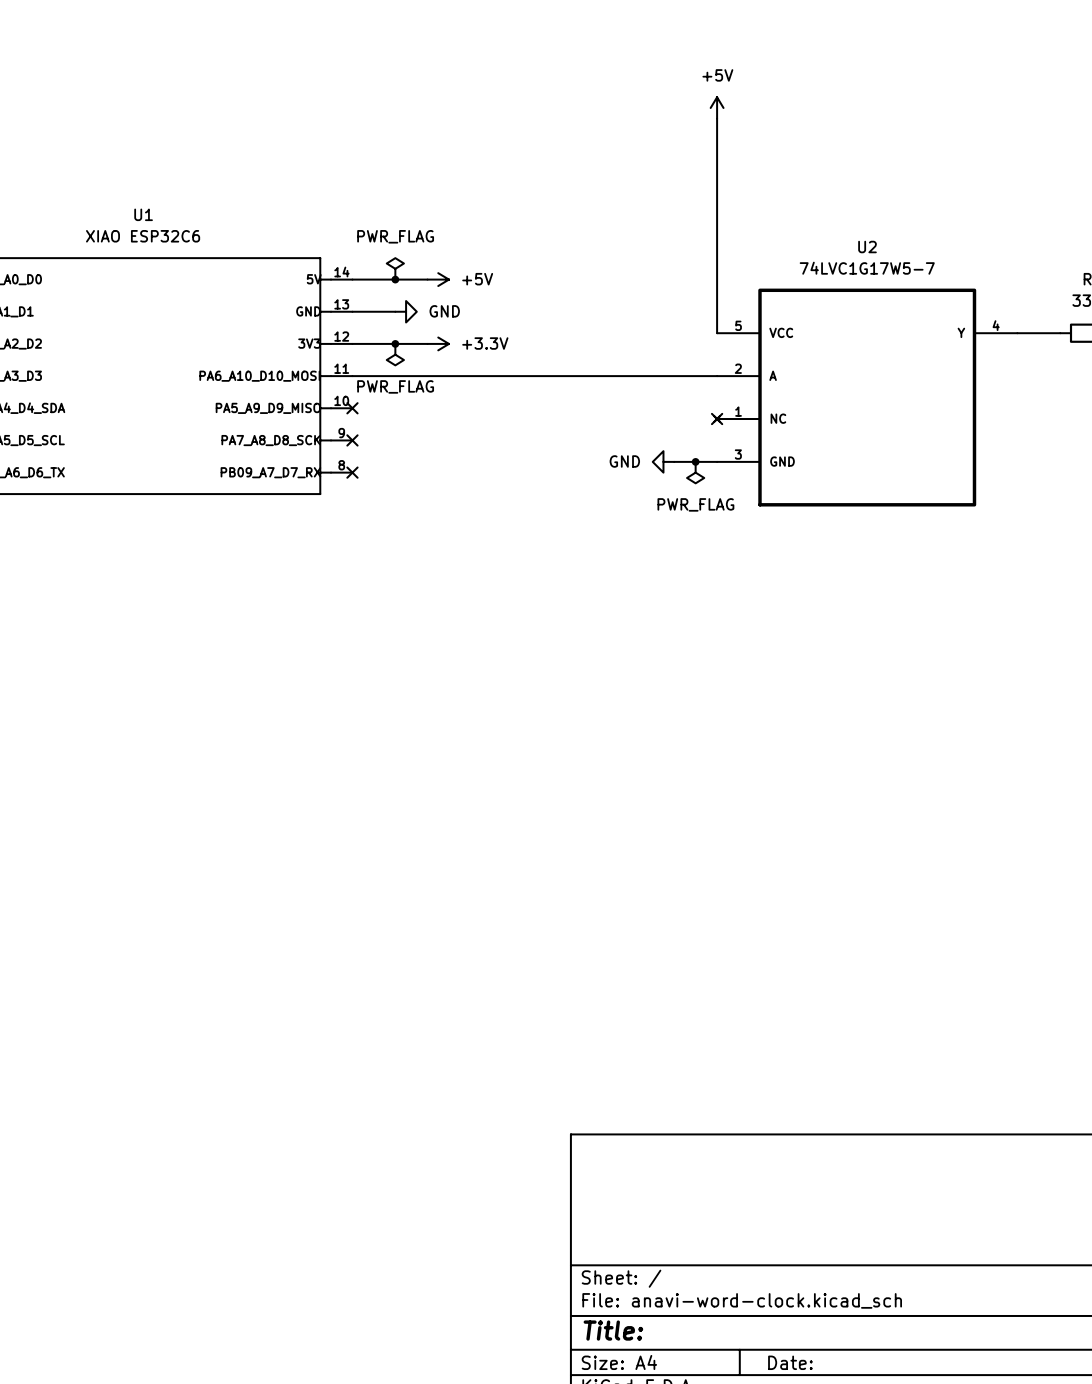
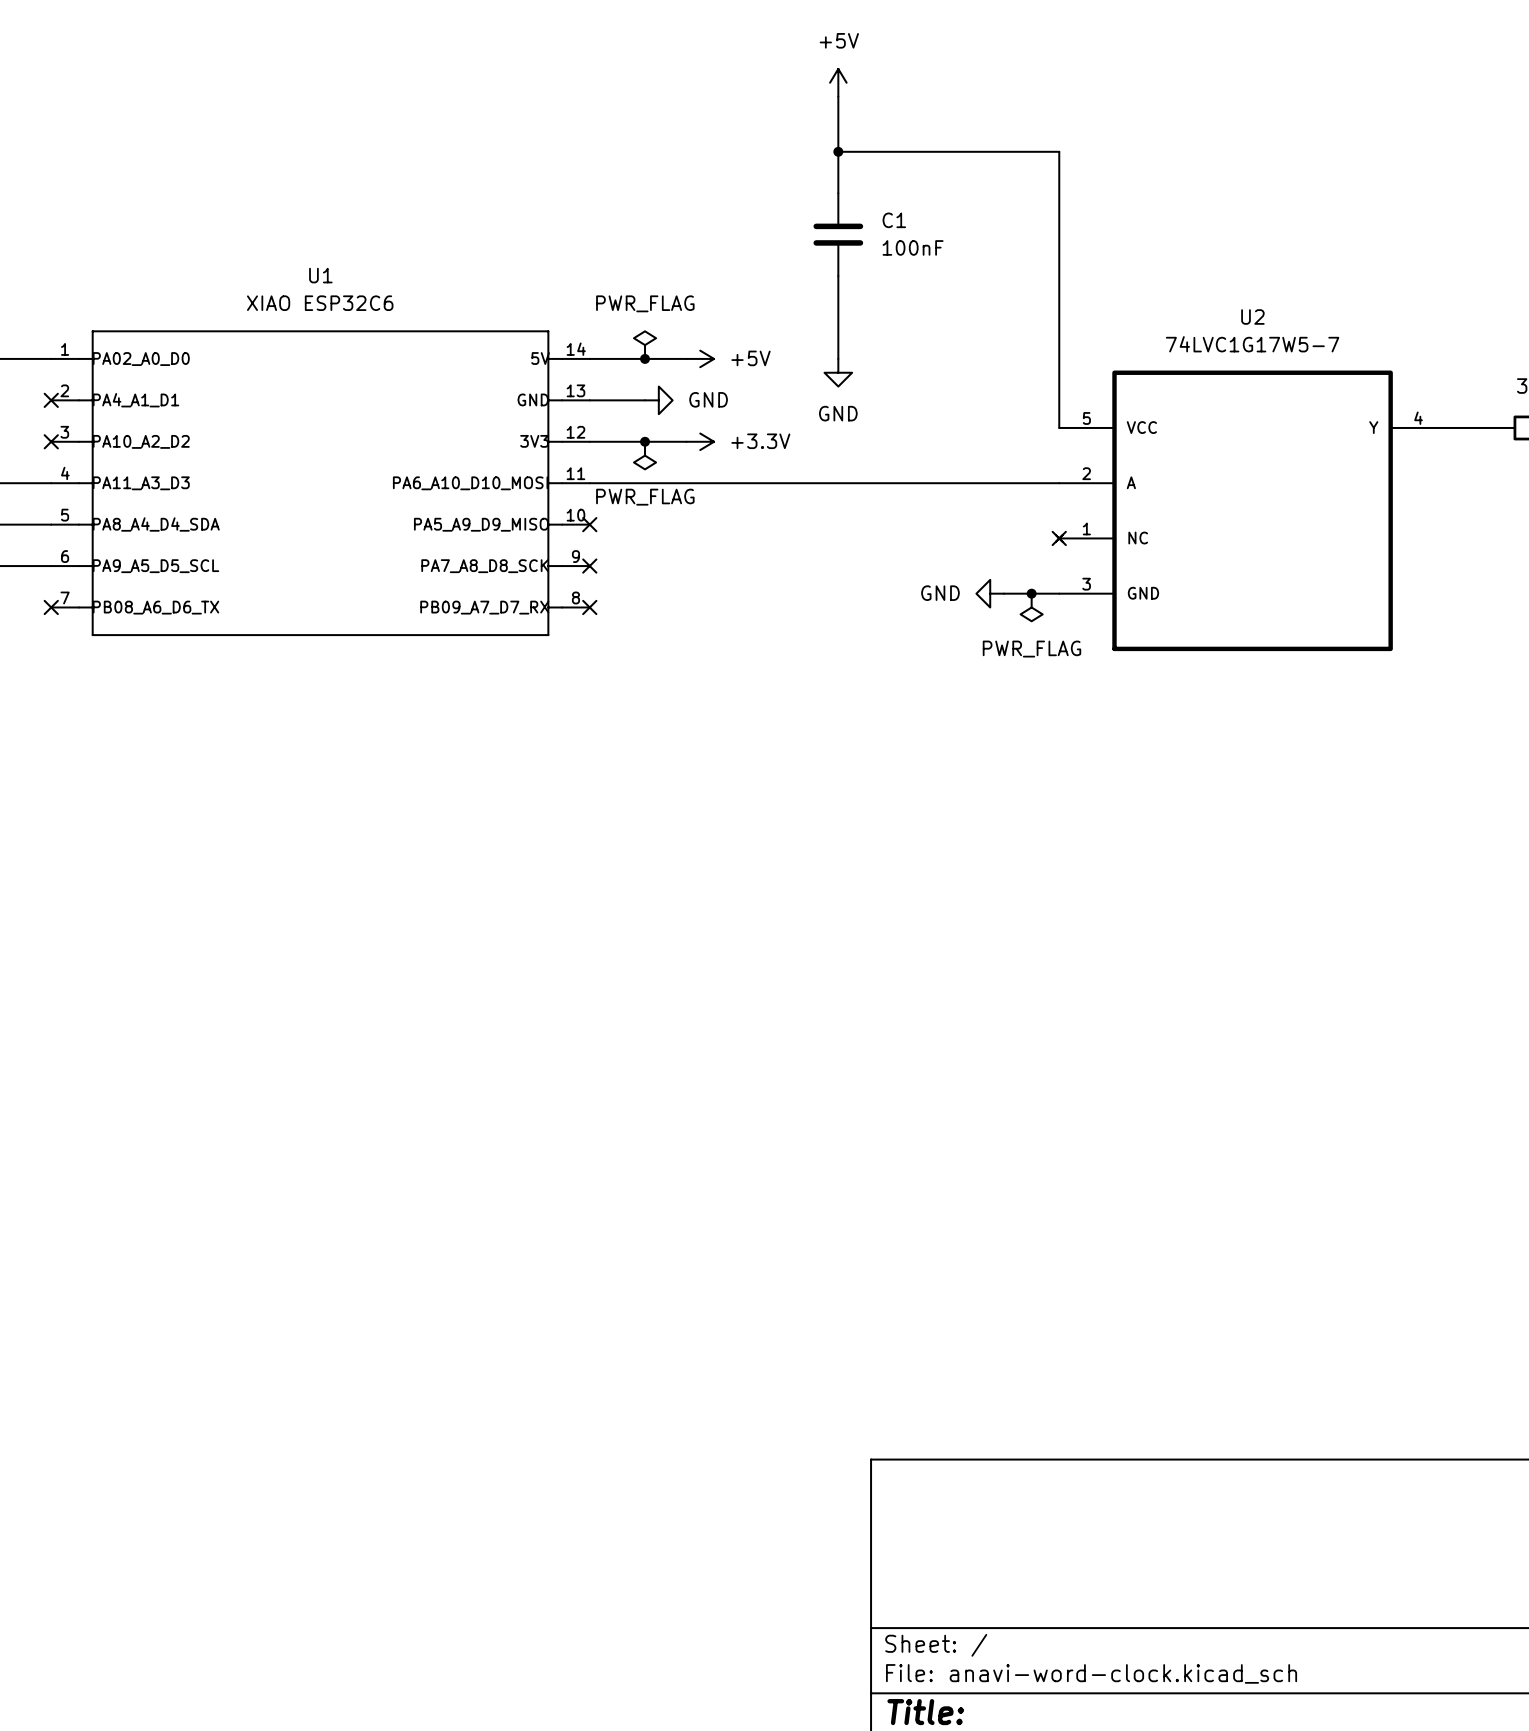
wire: none -> (838, 96) (838, 193)
power symbol position: +5V (717, 107) -> +5V (838, 82)
wire: none -> (838, 151) (1059, 151)
junction: none -> (838, 151)
C1: none -> 100nF (838, 234)
wire: none -> (838, 276) (838, 358)
power symbol: none -> GND (838, 372)

